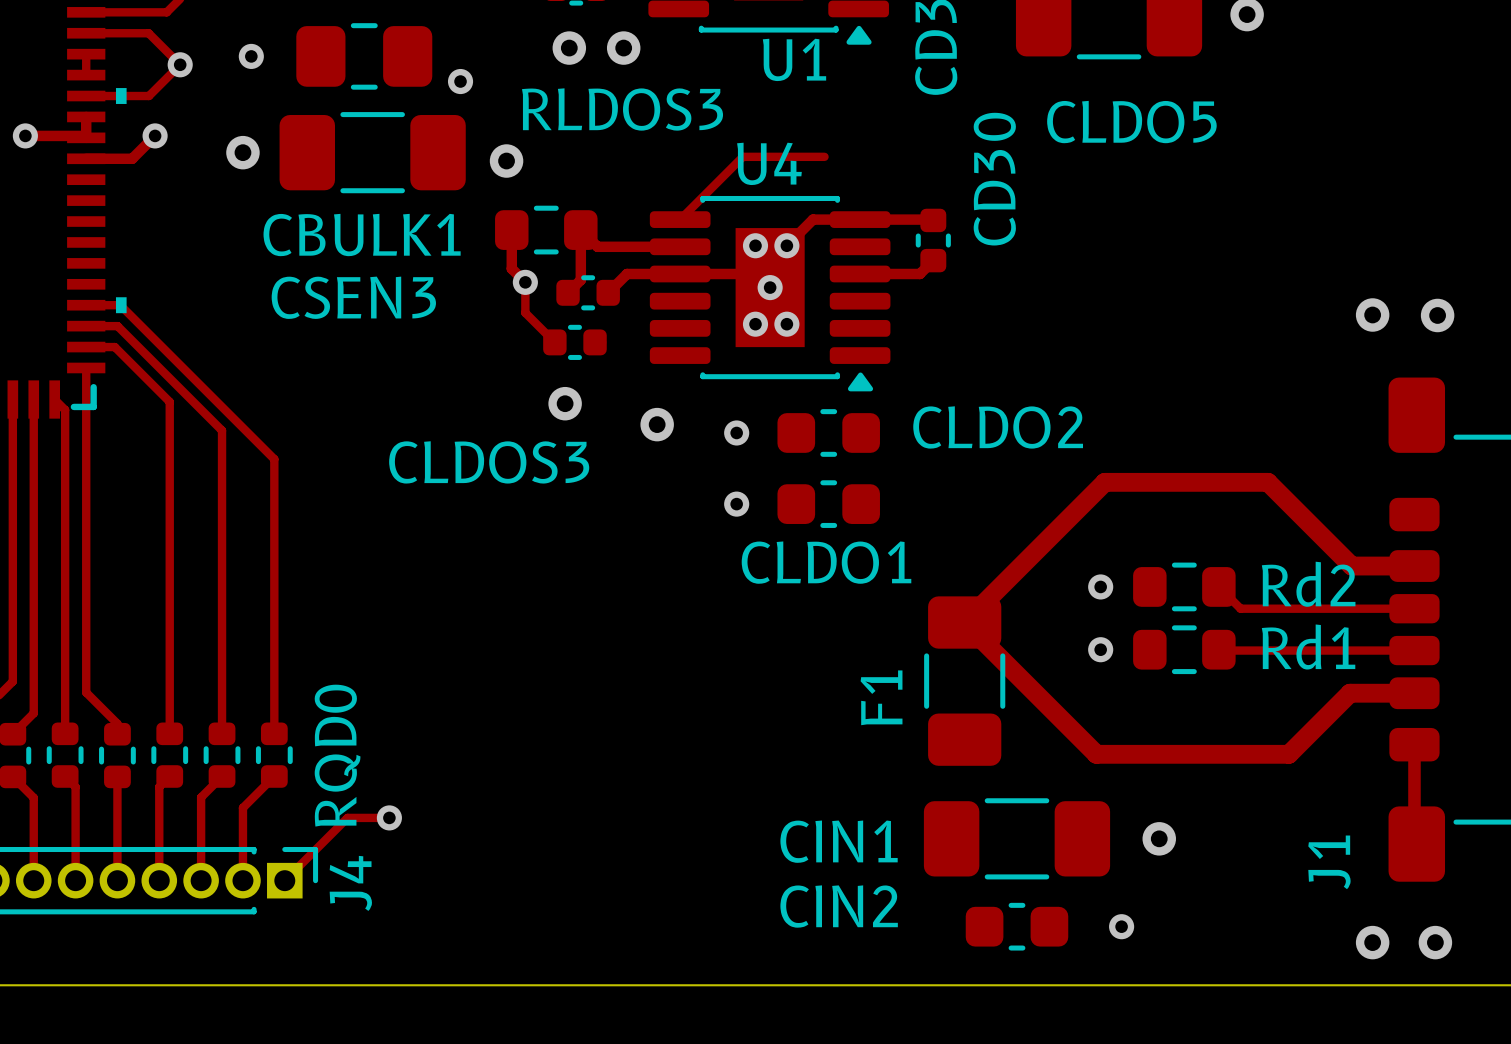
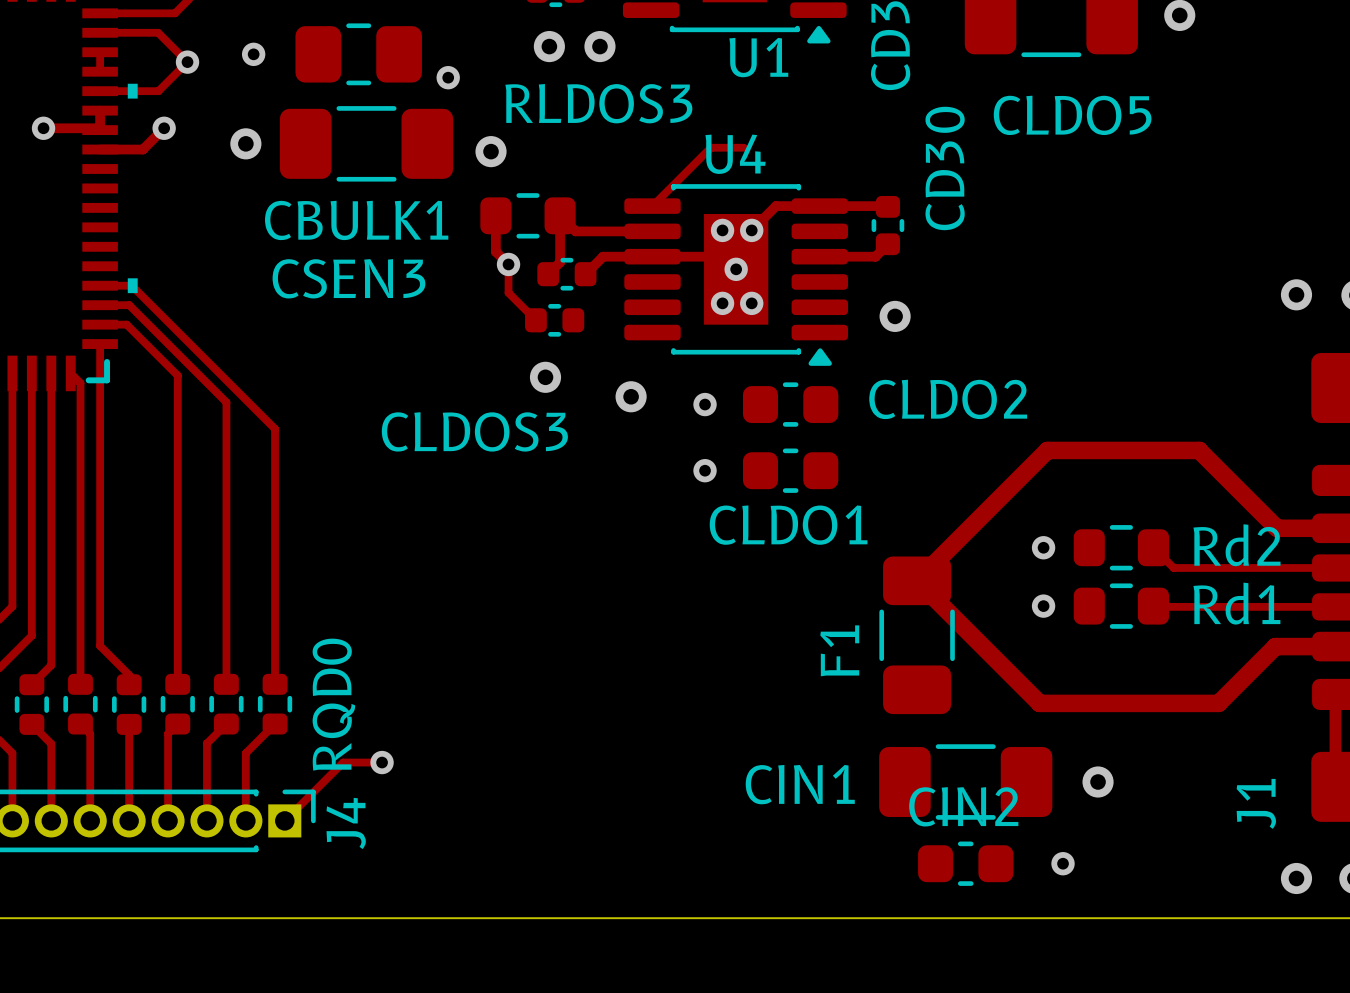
track: (778, 156) (824, 156) -> none
via: none -> (895, 316)
CIN2 name position: CIN2 (839, 906) -> CIN2 (963, 806)

